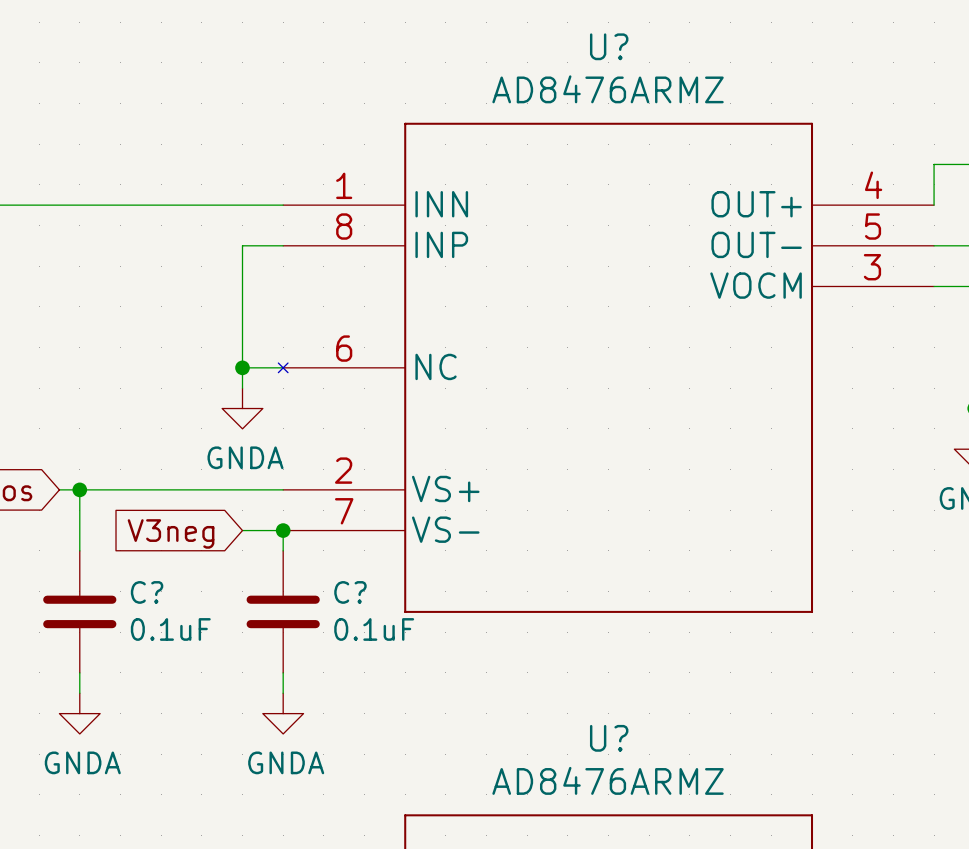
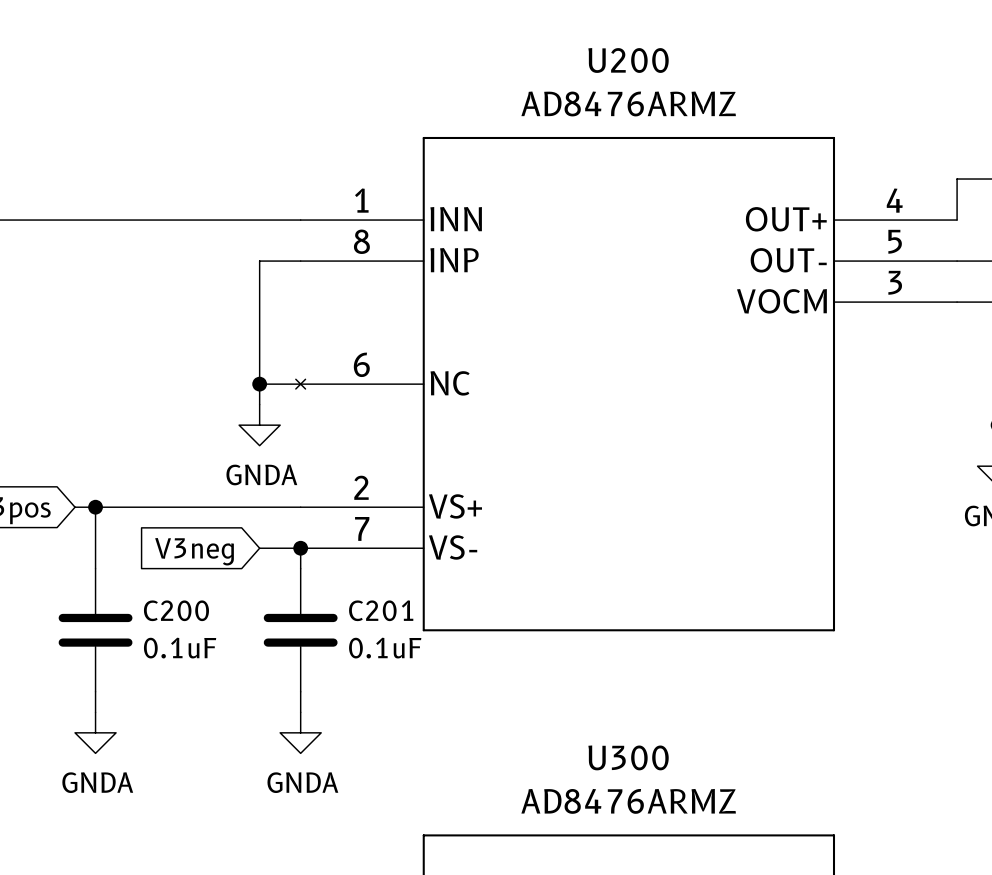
U? name: U? (609, 46) -> U200 (628, 60)
C? name: C? (147, 592) -> C200 (176, 610)
C? name: C? (350, 592) -> C201 (381, 610)
U? name: U? (609, 738) -> U300 (628, 757)

